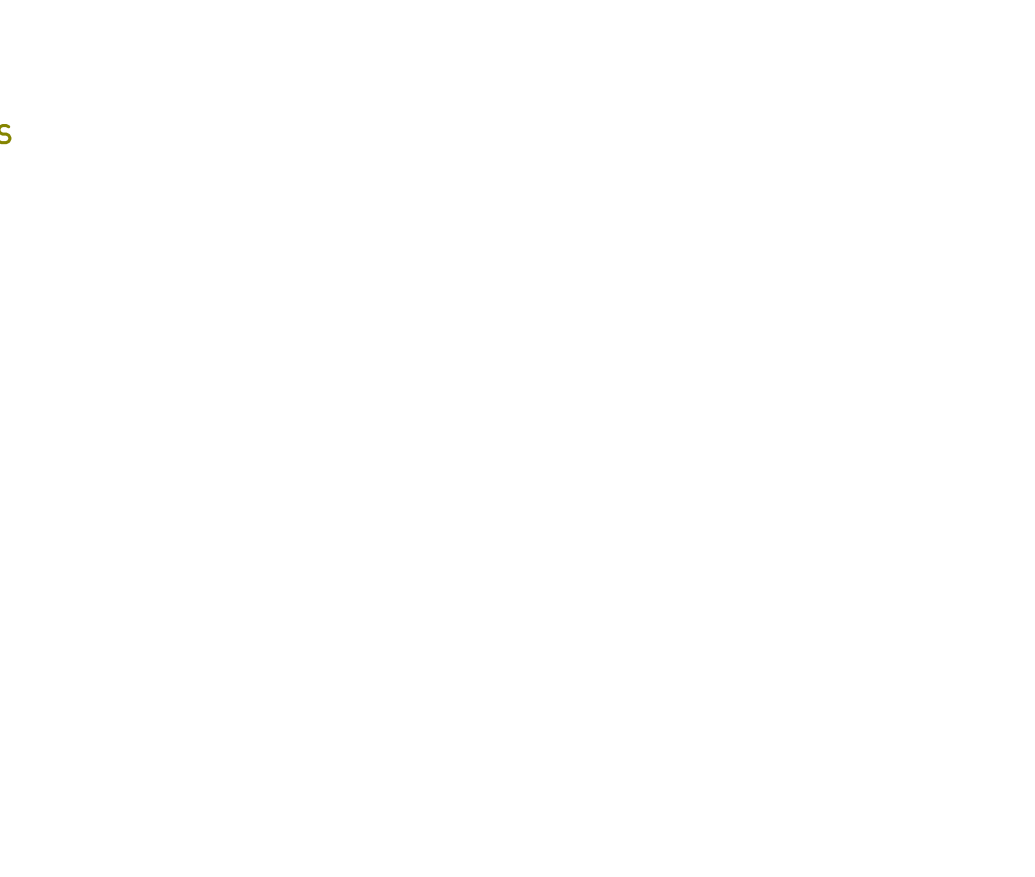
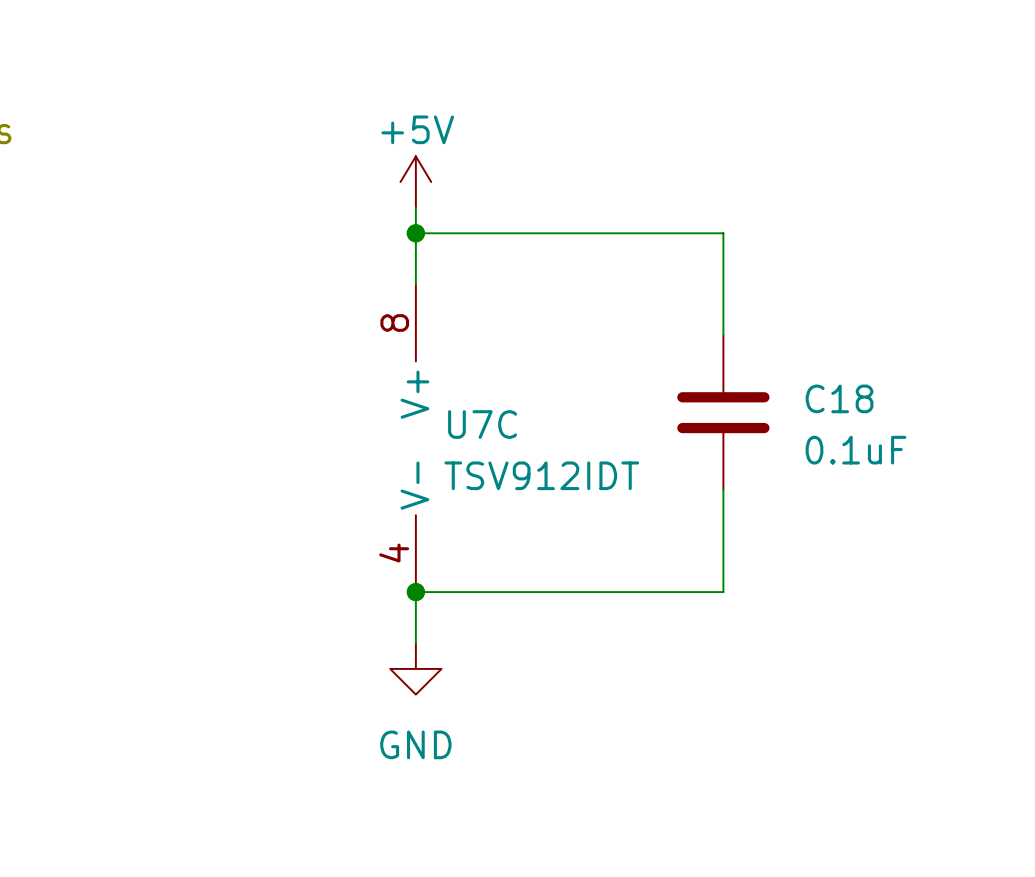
power symbol: none -> +5V (415, 182)
wire: none -> (415, 207) (415, 284)
wire: none -> (415, 233) (723, 233) (723, 335)
junction: none -> (415, 233)
C18: none -> 0.1uF (723, 412)
U7C: none -> TSV912IDT (415, 438)
wire: none -> (723, 489) (723, 592) (415, 592) (415, 643)
junction: none -> (415, 592)
power symbol: none -> GND (415, 668)

